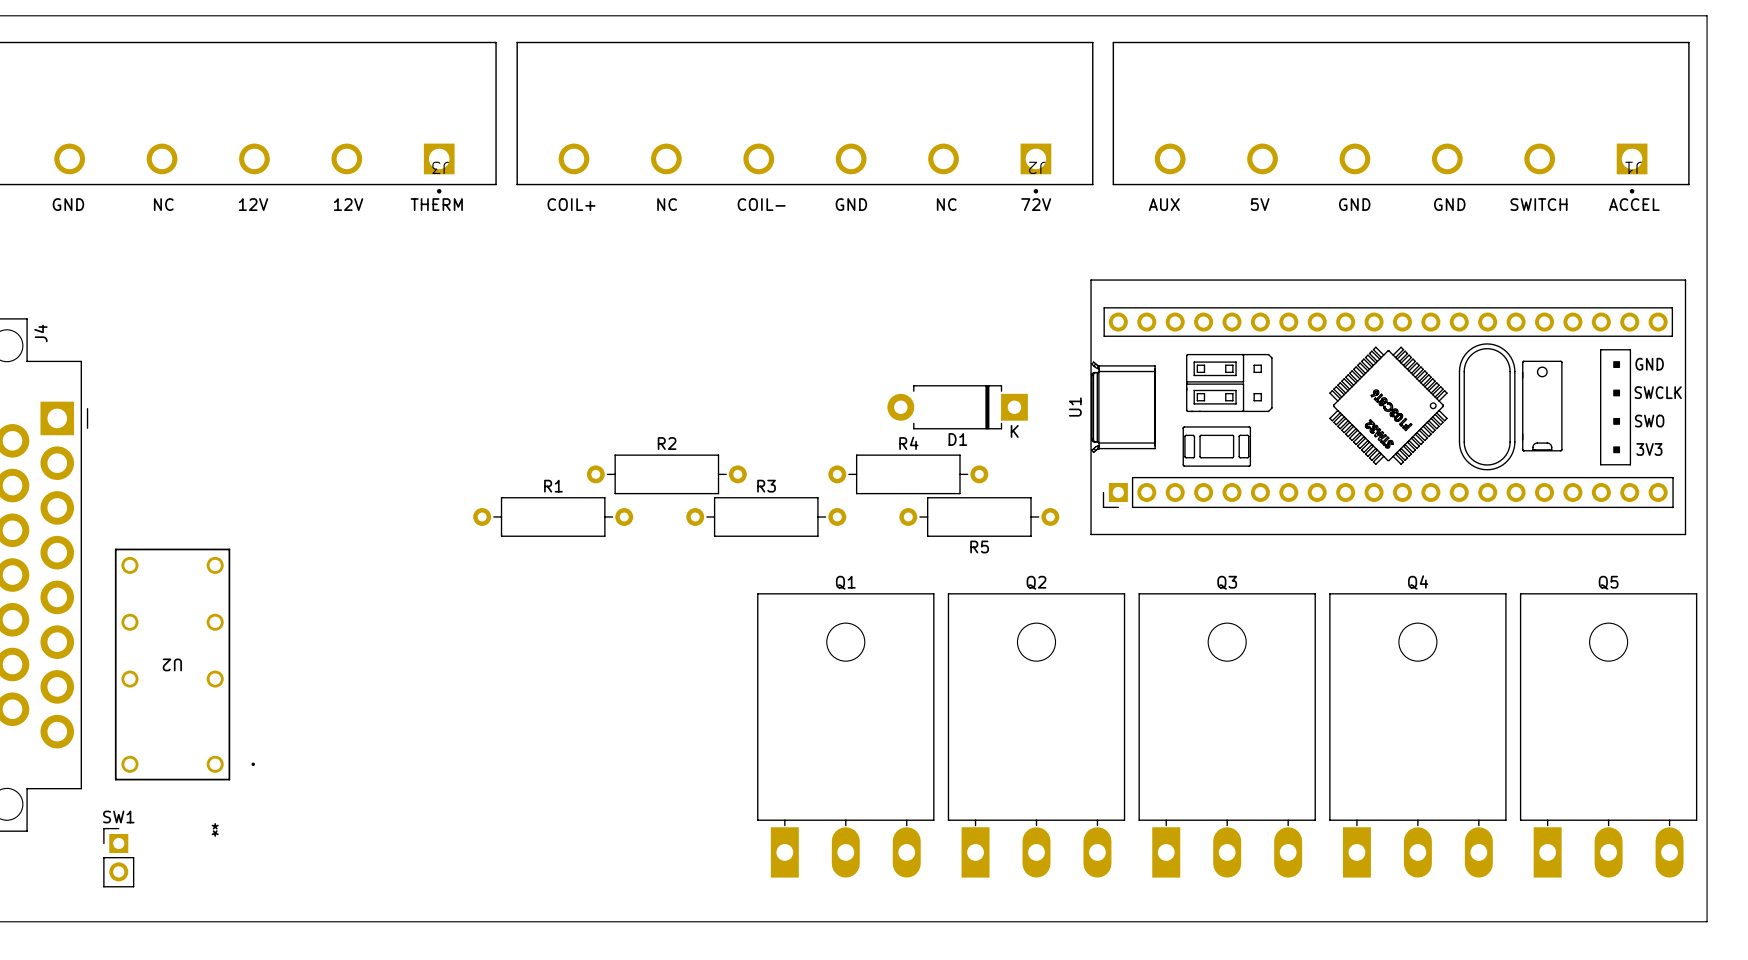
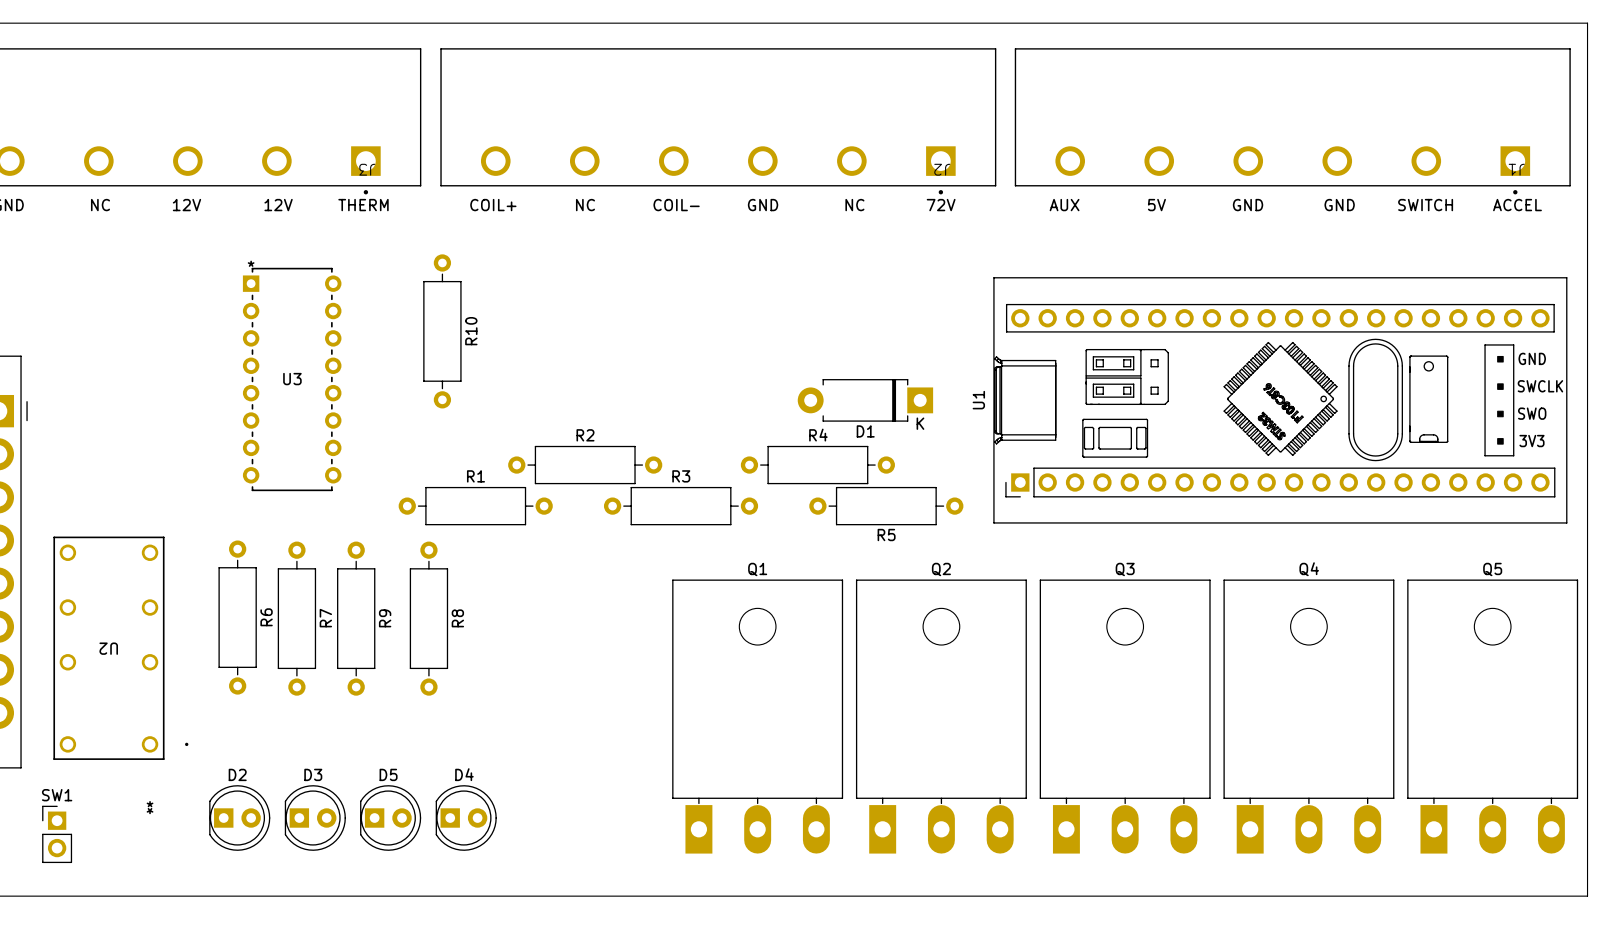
R10: none -> (442, 331)
U3: none -> (292, 379)
R6: none -> (237, 617)
R7: none -> (296, 618)
R9: none -> (356, 618)
R8: none -> (428, 618)
D2: none -> (239, 818)
D3: none -> (315, 818)
D5: none -> (390, 818)
D4: none -> (466, 818)

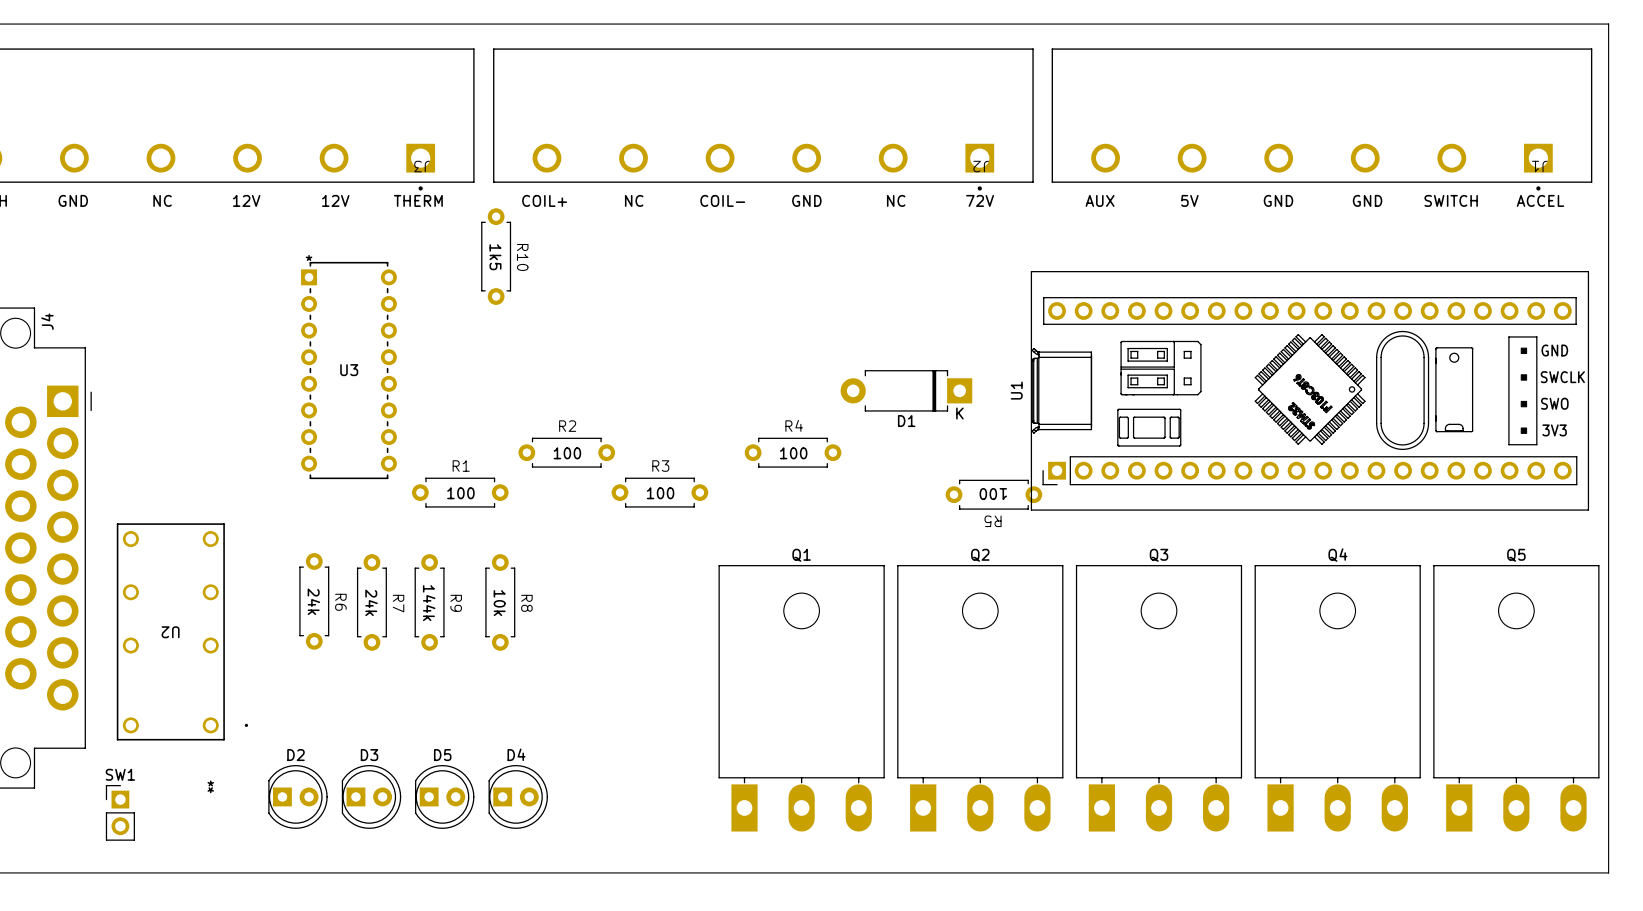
R10 footprint: [423, 254, 462, 409] -> [481, 208, 512, 305]
R10 value: none -> 1k5 (495, 257)
R2 footprint: [508, 445, 663, 485] -> [518, 437, 616, 468]
R4 footprint: [740, 445, 895, 485] -> [744, 437, 842, 468]
R2 value: none -> 100 (567, 453)
R4 value: none -> 100 (793, 453)
R1 footprint: [398, 486, 553, 526] -> [411, 477, 509, 508]
R3 footprint: [603, 486, 759, 526] -> [611, 477, 709, 508]
R5 footprint: [809, 486, 964, 526] -> [945, 479, 1043, 510]
R1 value: none -> 100 (460, 493)
R3 value: none -> 100 (660, 493)
R5 value: none -> 100 (993, 494)
R6 footprint: [218, 540, 257, 695] -> [299, 553, 330, 650]
R7 footprint: [277, 541, 317, 696] -> [356, 554, 387, 651]
R9 footprint: [337, 541, 376, 696] -> [414, 554, 445, 651]
R8 footprint: [409, 541, 449, 696] -> [485, 554, 516, 651]
R6 value: none -> 24k (313, 601)
R7 value: none -> 24k (371, 602)
R9 value: none -> 144k (429, 603)
R8 value: none -> 10k (499, 603)

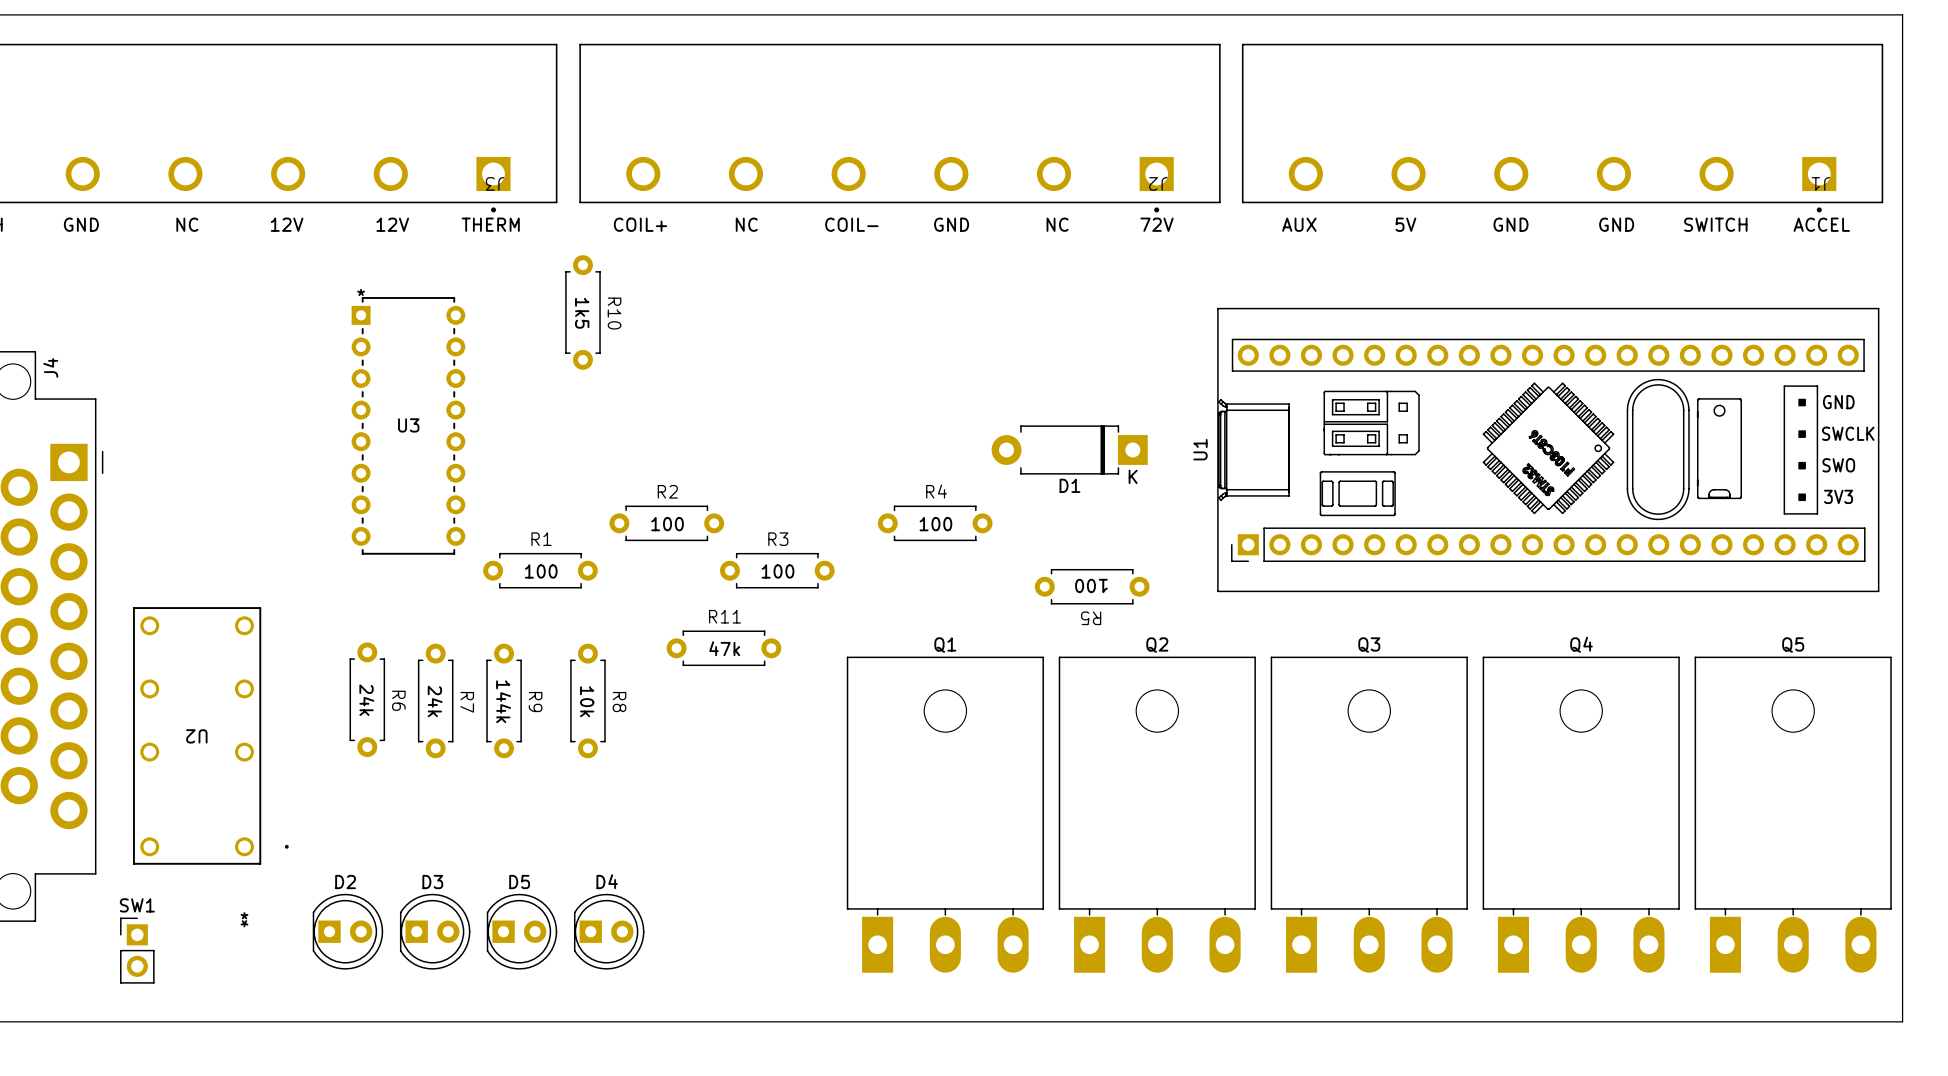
R10 position: (496, 256) -> (582, 312)
R5 position: (993, 494) -> (1092, 586)
R11: none -> 47k (723, 648)

